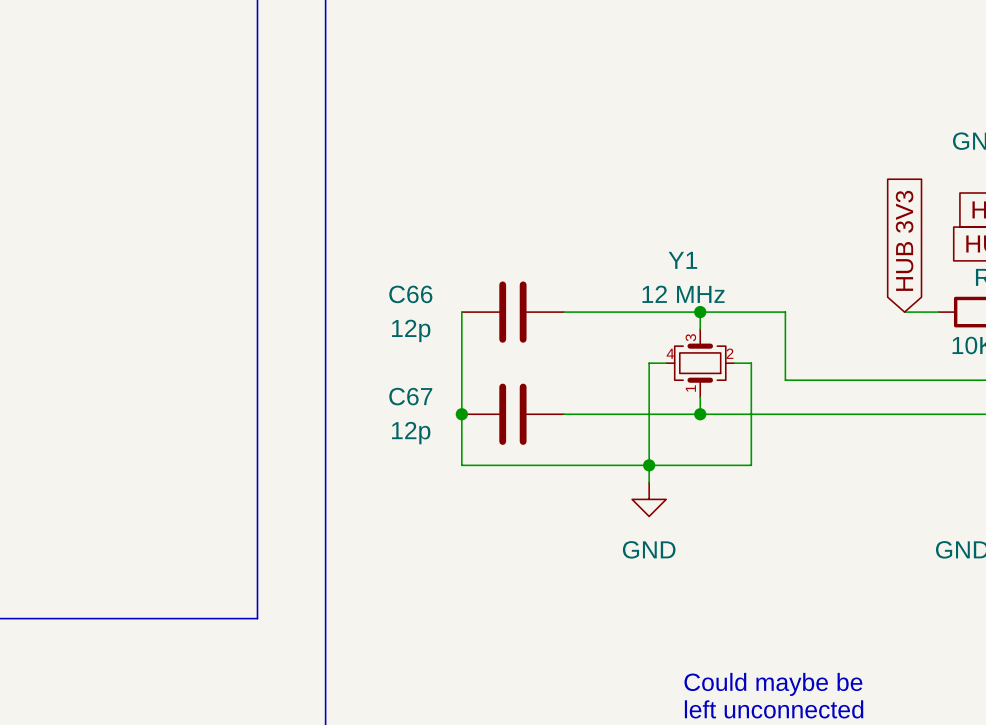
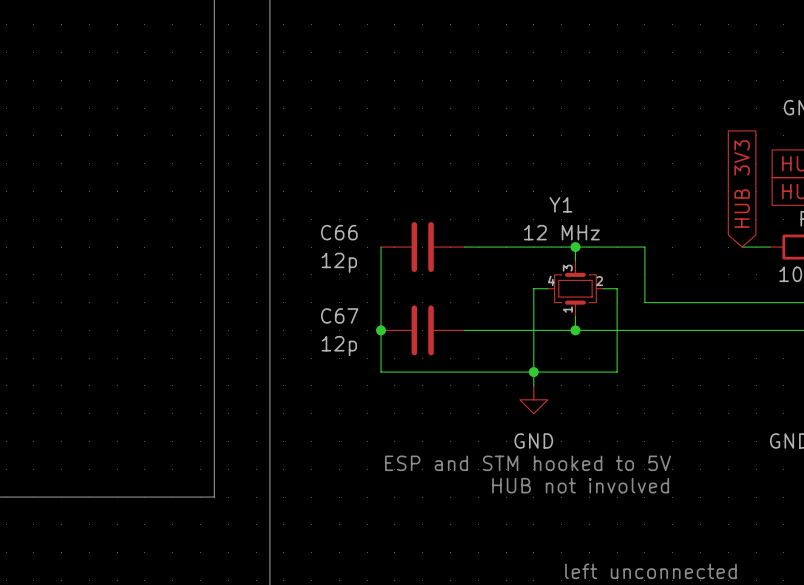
text: none -> ESP and STM hooked to 5V (528, 463)
text: none -> HUB not involved (580, 485)
text: Could maybe be (773, 684) -> none

